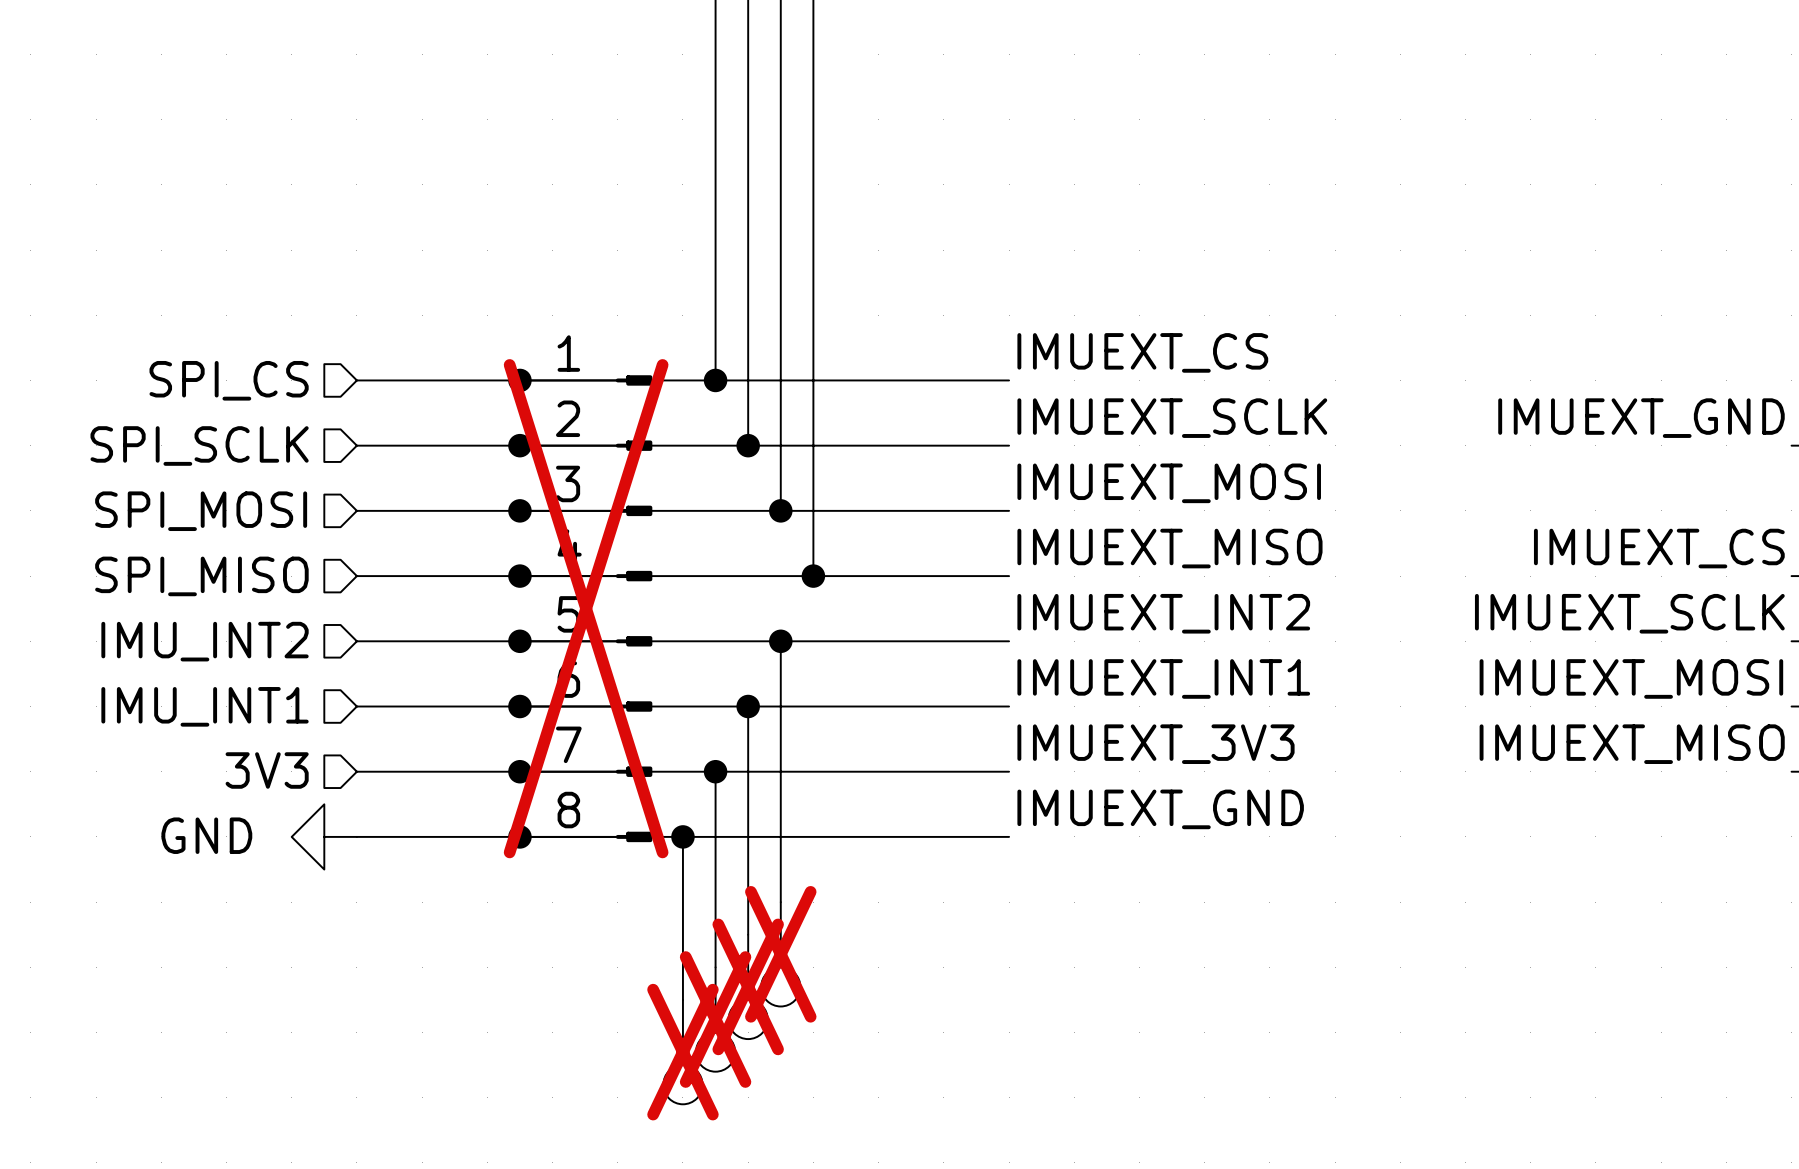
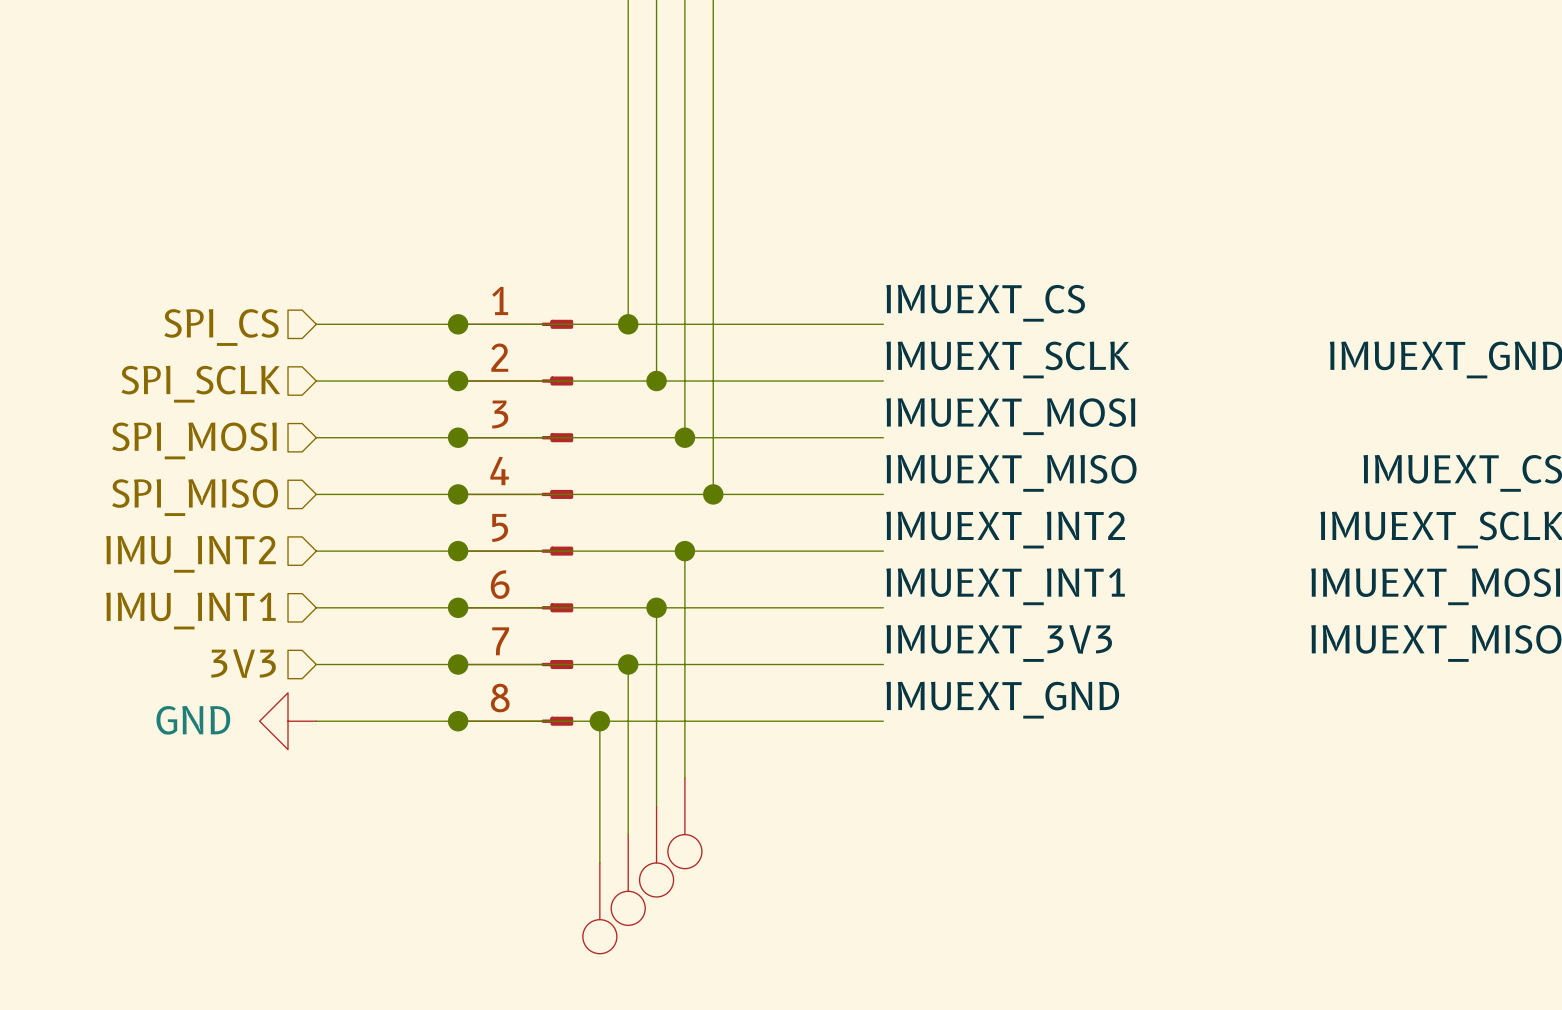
part do-not-place cross: (586, 608) -> none
part do-not-place cross: (780, 954) -> none
part do-not-place cross: (748, 986) -> none
part do-not-place cross: (715, 1019) -> none
part do-not-place cross: (682, 1052) -> none

